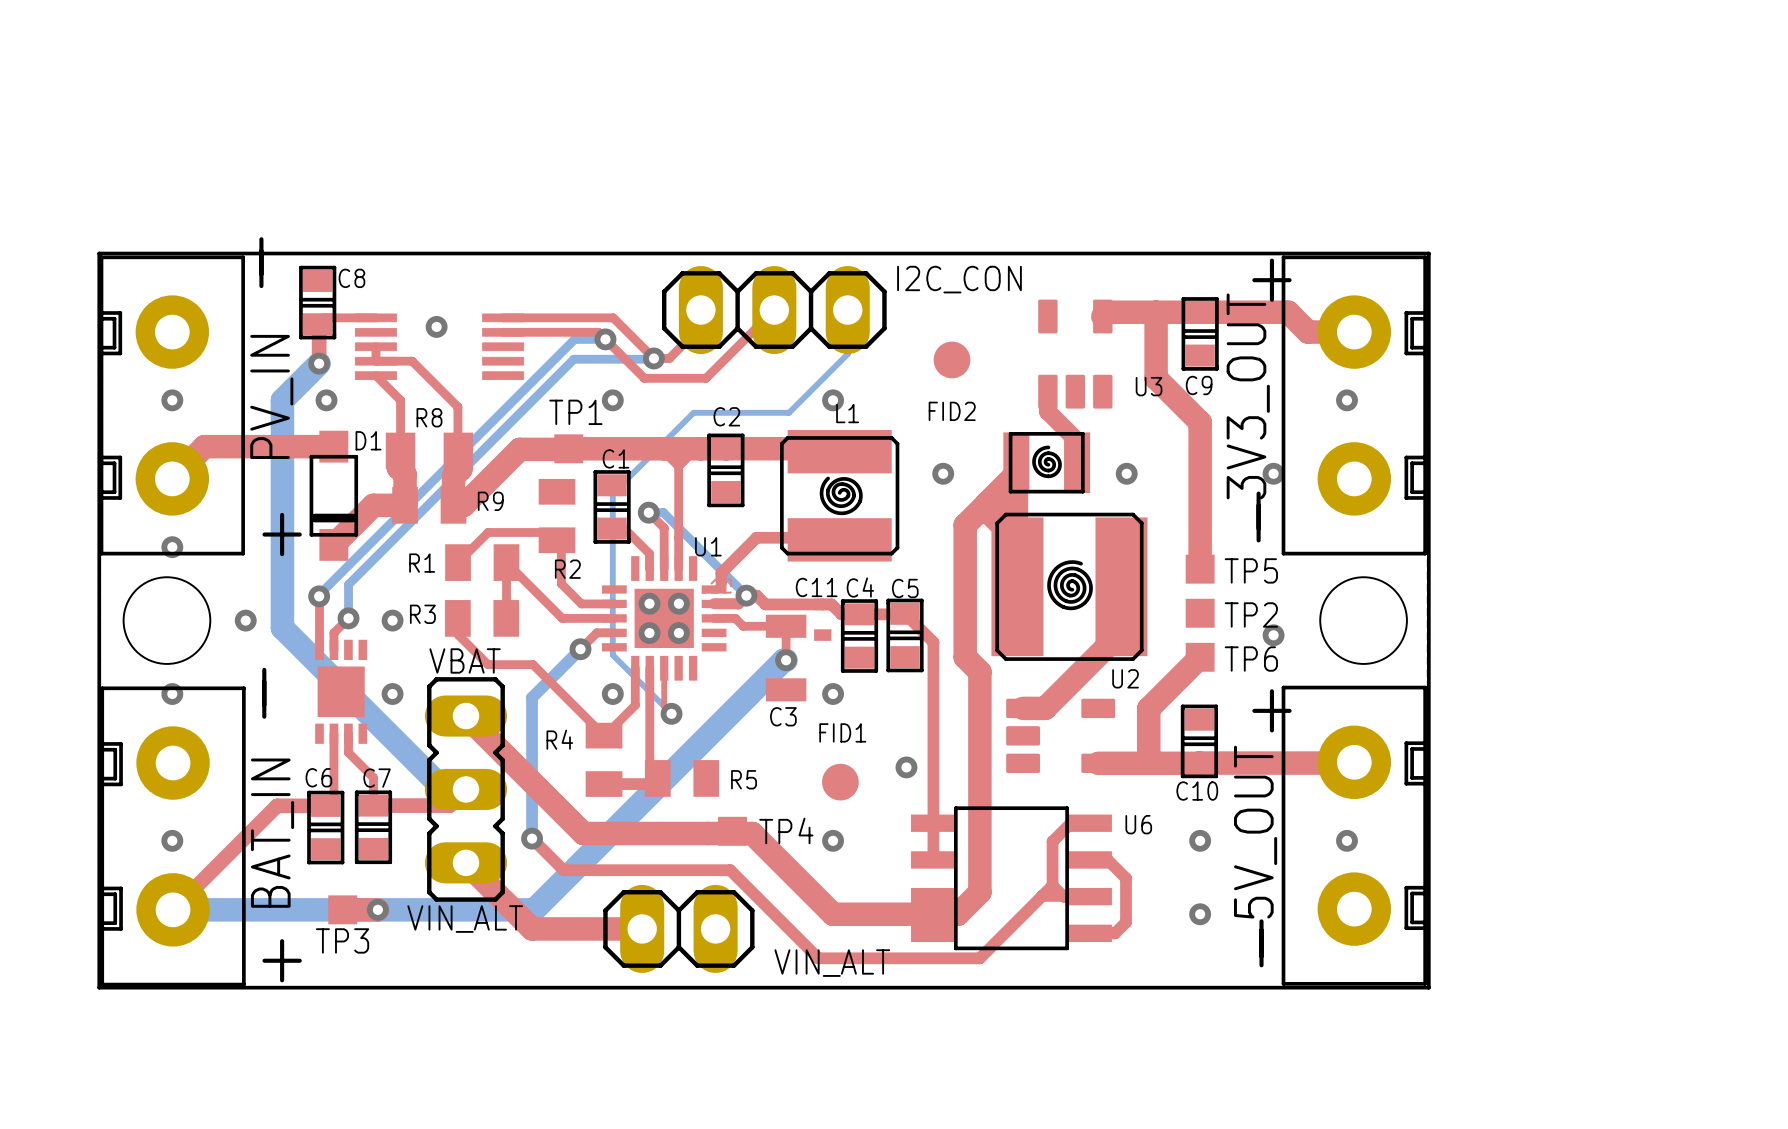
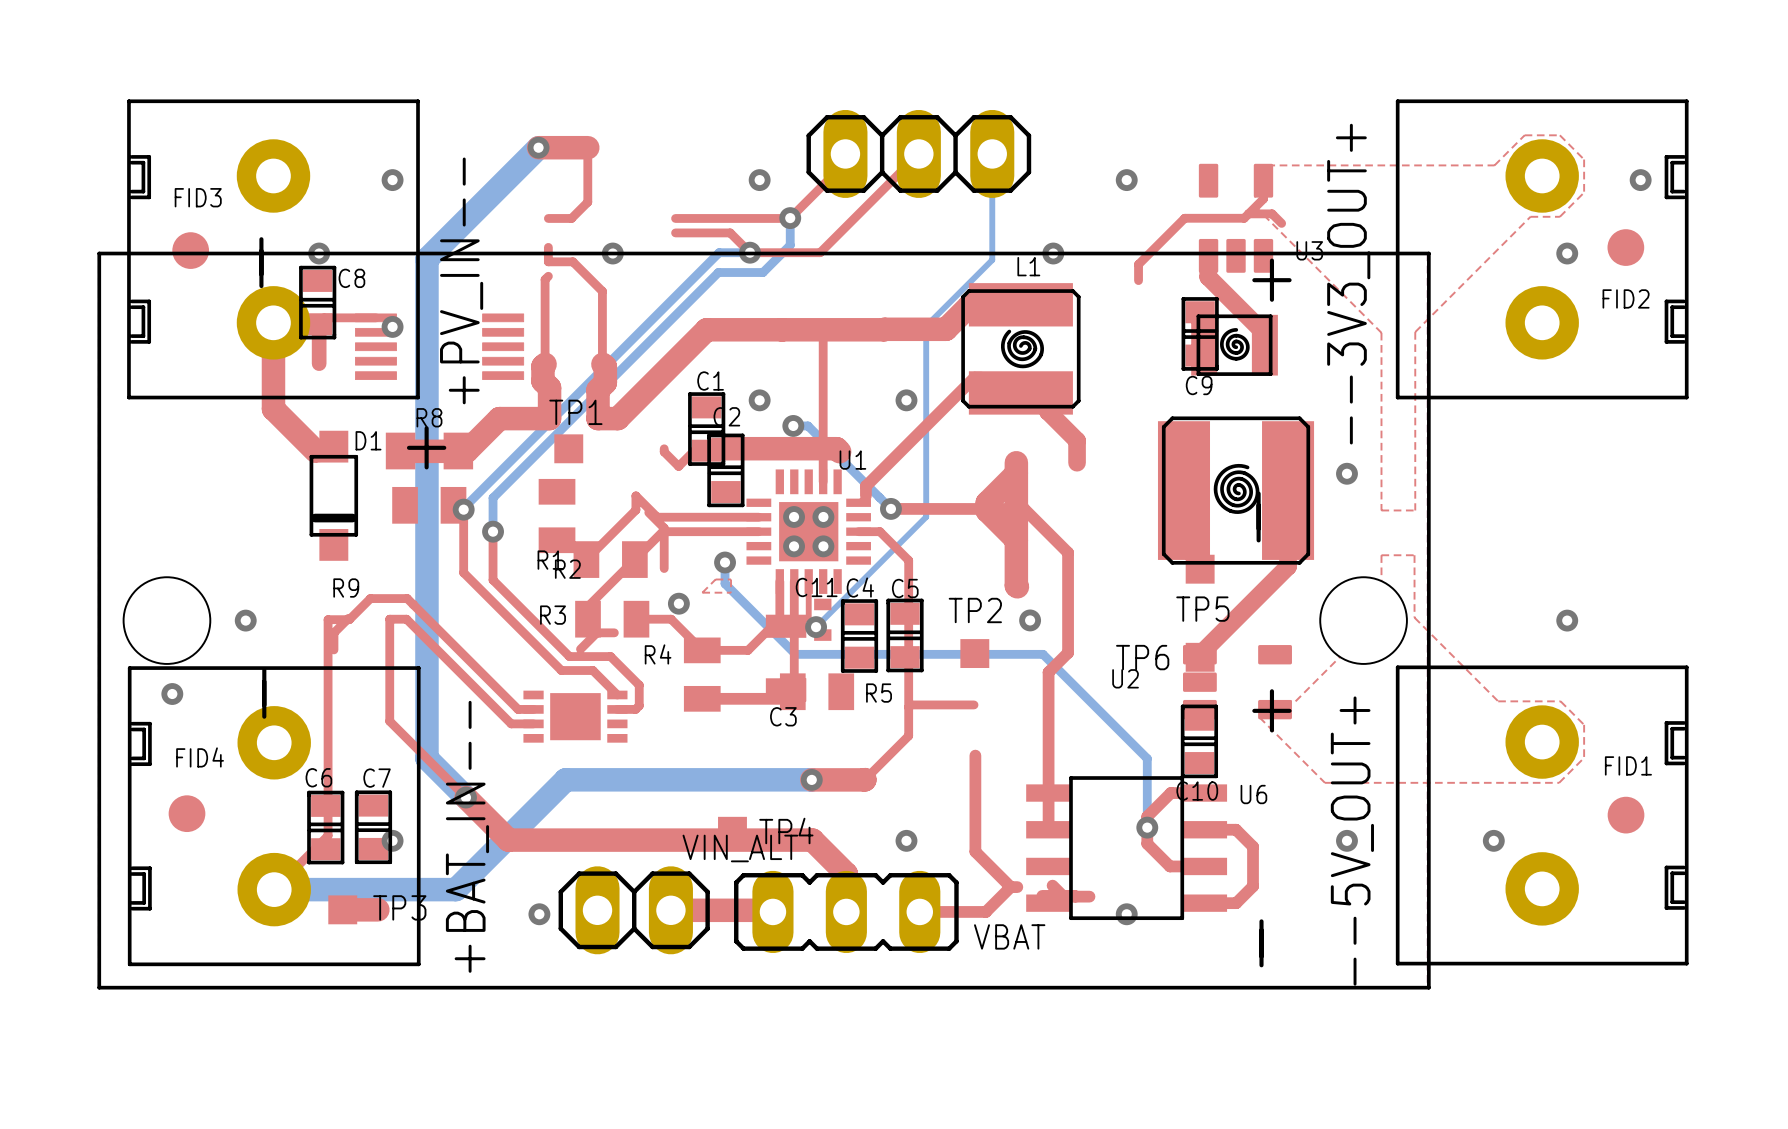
top zone outline: none -> (1524, 135) (1494, 165) (1255, 165) (1255, 206) (1381, 332) (1381, 510) (1415, 510) (1415, 332) (1530, 216) (1559, 216) (1584, 192) (1584, 159) (1559, 135) (1524, 135)
top track: none -> (538, 147) (587, 147) (587, 202) (571, 218) (548, 218)
bottom track: none -> (538, 147) (426, 259) (426, 758) (465, 797)
via: none -> (538, 147)
top track: none -> (845, 153) (845, 162) (789, 218) (675, 218)
top track: none -> (918, 153) (820, 252) (749, 252) (730, 232) (675, 232)
bottom track: none -> (992, 153) (992, 260) (926, 326) (926, 516) (816, 627)
via: none -> (392, 180)
via: none -> (759, 180)
via: none -> (1126, 180)
top track: none -> (1263, 180) (1263, 198) (1244, 218) (1184, 218) (1138, 264) (1138, 280)
via: none -> (1640, 180)
top track: none -> (1248, 213) (1272, 213) (1281, 223)
bottom track: none -> (790, 218) (790, 245) (762, 272) (718, 272) (493, 497) (493, 531)
via: none -> (790, 218)
top track: none -> (548, 247) (548, 261) (572, 261) (602, 291) (602, 364)
+PV_IN--: none -> (273, 249)
--3V3_OUT+: none -> (1542, 249)
FID3: none -> (190, 250)
via: none -> (749, 252)
via: none -> (319, 253)
via: none -> (612, 253)
via: none -> (1053, 253)
via: none -> (1567, 253)
top track: none -> (1208, 256) (1208, 277) (1264, 333) (1264, 345)
top track: none -> (548, 276) (545, 279) (545, 364) (542, 366) (542, 381) (549, 387) (549, 418) (499, 418) (466, 451) (414, 451)
text: I2C_CON (959, 279) -> none
top track: none -> (1020, 304) (969, 305) (945, 329) (706, 329) (617, 418) (598, 418) (598, 389) (605, 382) (605, 366) (602, 364)
top track: (700, 310) (700, 326) (669, 358) (653, 358) (613, 317) (503, 317) -> none
top track: (774, 310) (706, 378) (644, 378) (598, 332) (503, 332) -> none
part position: (774, 310) -> (918, 153)
bottom track: (847, 310) (847, 354) (789, 412) (693, 412) (612, 493) (612, 655) (671, 713) -> none
top track: (1156, 312) (1156, 378) (1200, 422) (1200, 569) -> none
top track: (1102, 316) (1107, 312) (1288, 312) (1308, 332) (1354, 332) -> none
top track: none -> (273, 322) (273, 409) (315, 451)
via: none -> (392, 326)
via: (436, 326) -> none
top track: none -> (823, 330) (823, 481)
bottom track: (605, 339) (574, 339) (319, 596) -> (749, 252) (719, 252) (463, 509)
via: (605, 339) -> none
top track: (375, 346) (375, 361) (412, 361) (457, 406) (457, 451) -> none
U3 position: (1075, 354) -> (1236, 218)
bottom track: (653, 358) (573, 359) (348, 584) (348, 618) -> none
via: (653, 358) -> none
FID2 position: (952, 359) -> (1625, 247)
bottom track: (319, 363) (282, 400) (282, 627) (443, 789) (465, 789) -> none
via: (319, 363) -> none
top track: (375, 375) (400, 400) (400, 451) (398, 453) (398, 467) (405, 474) (405, 505) (373, 505) (333, 544) -> none
top track: none -> (981, 377) (974, 377) (865, 486) (865, 495)
via: (172, 400) -> none
via: (326, 400) -> none
via: (612, 400) -> none
via: none -> (759, 400)
via: (833, 400) -> none
via: none -> (906, 400)
via: (1346, 400) -> none
PV_IN: (172, 405) -> none
3V3_OUT: (1354, 405) -> none
via: none -> (793, 425)
top track: (333, 446) (204, 446) (172, 478) -> none
top track: (725, 448) (519, 449) (463, 505) (453, 505) (453, 476) (460, 469) (460, 453) (458, 451) -> none
top track: (678, 449) (678, 568) -> none
part position: (1046, 462) -> (1234, 345)
via: (943, 473) -> none
via: (1126, 473) -> none
via: (1273, 473) -> none
via: none -> (1346, 473)
top track: none -> (1288, 490) (1288, 566) (1199, 654)
L1 position: (839, 495) -> (1020, 348)
R9 name position: R9 (490, 501) -> R9 (346, 588)
top track: (1016, 503) (987, 503) (965, 525) (965, 657) (979, 671) (979, 892) (957, 914) (833, 914) (752, 833) (583, 833) (465, 716) -> none
C1 position: (612, 506) -> (706, 429)
top track: none -> (890, 508) (1012, 508)
via: none -> (890, 508)
top track: none -> (1012, 508) (1024, 508) (1068, 552) (1068, 652) (1048, 672) (1048, 829)
top track: none -> (463, 509) (463, 572) (561, 670) (592, 670) (617, 694)
via: none -> (463, 509)
bottom track: (648, 512) (663, 512) (746, 595) -> (793, 425) (807, 425) (890, 508)
via: (648, 512) -> none
via: none -> (794, 516)
via: none -> (823, 516)
top track: none -> (758, 517) (657, 517) (635, 495) (635, 510) (586, 559)
top track: (612, 528) (624, 528) (649, 553) (649, 568) -> none
top track: none -> (493, 531) (493, 580) (569, 656) (610, 656) (639, 685) (639, 705) (635, 709) (617, 709)
via: none -> (493, 531)
top track: none -> (758, 531) (662, 531) (588, 606) (588, 619)
top track: none -> (858, 531) (879, 531) (908, 560) (908, 735) (865, 779)
top track: (549, 532) (488, 532) (458, 562) -> none
text position: + (282, 534) -> + (426, 447)
top track: (839, 539) (837, 537) (756, 537) (721, 572) (721, 582) -> none
top track: (557, 540) (561, 544) (561, 583) (581, 603) (614, 603) -> none
via: none -> (794, 546)
via: none -> (823, 546)
via: (172, 547) -> none
top zone outline: none -> (1381, 555) (1381, 615) (1295, 701) (1259, 701) (1259, 717) (1324, 782) (1559, 782) (1584, 757) (1584, 724) (1560, 701) (1498, 701) (1414, 617) (1414, 555) (1381, 555)
R1 position: (482, 562) -> (610, 559)
bottom track: none -> (725, 562) (725, 583) (795, 654) (1043, 654) (1147, 758) (1147, 827)
via: none -> (725, 562)
TP5 name position: TP5 (1251, 570) -> TP5 (1202, 609)
top track: none -> (779, 581) (779, 618) (748, 650) (702, 650) (671, 619) (636, 619)
top track: none -> (794, 581) (792, 691) (785, 698) (702, 698)
part position: (1069, 586) -> (1236, 490)
top track: (1121, 586) (1121, 632) (1045, 708) (1023, 708) -> none
via: (746, 595) -> none
top track: (319, 596) (319, 649) -> none
via: (319, 596) -> none
via: (649, 603) -> none
top track: (714, 603) (738, 603) (746, 595) (756, 595) (765, 604) (831, 604) (841, 614) (905, 613) (933, 642) (933, 859) -> none
TP2 position: (1200, 613) -> (974, 653)
TP2 name position: TP2 (1251, 614) -> TP2 (975, 610)
via: (348, 618) -> none
top track: (457, 618) (458, 635) (488, 664) (533, 664) (604, 735) (635, 705) (635, 668) -> none
R3 position: (482, 618) -> (612, 619)
top track: (506, 618) (506, 562) (562, 618) (614, 618) -> none
U1 position: (664, 618) -> (808, 531)
top track: (714, 618) (735, 618) (743, 626) (786, 626) (786, 660) -> none
via: (392, 620) -> none
via: none -> (1030, 620)
via: none -> (1567, 620)
via: none -> (816, 627)
via: (649, 633) -> none
via: (678, 633) -> none
via: (1273, 635) -> none
bottom track: (580, 649) (532, 697) (532, 838) -> none
via: (580, 649) -> none
top track: (1200, 657) (1148, 708) (1148, 763) -> none
TP6 name position: TP6 (1251, 659) -> TP6 (1142, 657)
text position: VBAT (465, 660) -> VBAT (1009, 936)
bottom track: (786, 660) (783, 660) (534, 909) (173, 909) -> none
via: (786, 660) -> none
top track: (649, 668) (649, 766) (657, 778) (652, 784) (604, 784) -> none
top track: (664, 668) (664, 706) (671, 713) -> (808, 581) (808, 619) (816, 627)
part rotation: 0° (341, 691) -> 90° clockwise (575, 716)
part position: (341, 691) -> (575, 716)
via: (392, 694) -> none
via: (612, 694) -> none
via: (833, 694) -> none
top track: none -> (974, 704) (910, 704) (908, 707)
top track: none -> (533, 709) (518, 709) (407, 598) (370, 598) (349, 619) (328, 619) (328, 835) (274, 889)
via: (671, 713) -> none
top track: none -> (533, 723) (511, 723) (406, 619) (389, 619) (389, 721) (508, 840) (812, 840) (846, 873) (846, 911)
top track: (333, 733) (333, 797) (325, 805) (277, 805) (173, 909) -> none
top track: (348, 733) (348, 752) (373, 777) (373, 805) (449, 805) (465, 789) -> none
U2 position: (1060, 735) -> (1237, 682)
top track: none -> (975, 755) (975, 851) (1010, 887)
R4 position: (604, 759) -> (702, 674)
top track: (1354, 762) (1199, 763) -> none
top track: (1098, 763) (1199, 763) -> none
via: (906, 767) -> none
R5 position: (682, 778) -> (817, 691)
top track: none -> (811, 779) (864, 779)
bottom track: none -> (811, 779) (565, 779) (455, 889) (274, 889)
via: none -> (811, 779)
FID1 position: (840, 782) -> (1626, 815)
part rotation: 0° (465, 789) -> 90° clockwise (846, 911)
part position: (465, 789) -> (846, 911)
top track: none -> (1204, 793) (1170, 793) (1147, 816) (1147, 843) (1169, 866) (1204, 866)
via: none -> (465, 797)
FID4: none -> (187, 813)
--5V_OUT+: none -> (1542, 815)
+BAT_IN--: none -> (274, 816)
top track: (1089, 823) (1070, 823) (1052, 841) (1052, 885) (979, 958) (818, 958) (730, 870) (563, 870) (532, 838) -> none
via: none -> (1147, 827)
top track: none -> (1204, 829) (1236, 829) (1253, 846) (1253, 886) (1236, 903) (1204, 903)
5V_OUT: (1354, 835) -> none
BAT_IN: (173, 836) -> none
via: (532, 838) -> none
via: (172, 840) -> none
via: none -> (392, 840)
via: (833, 840) -> none
via: none -> (906, 840)
via: (1200, 840) -> none
via: none -> (1493, 840)
text: none -> VIN_ALT (740, 848)
top track: (1089, 859) (1107, 859) (1126, 878) (1126, 922) (1114, 933) (1089, 933) -> none
top track: (465, 862) (532, 928) (642, 928) -> none
U6 position: (1011, 878) -> (1126, 848)
top track: none -> (1010, 887) (1017, 887)
top track: none -> (1010, 887) (985, 911) (919, 911)
via: (377, 909) -> none
top track: none -> (670, 910) (771, 910) (772, 911)
via: none -> (539, 914)
via: none -> (1126, 914)
via: (1200, 914) -> none
text: VIN_ALT (465, 919) -> none
part position: (678, 928) -> (634, 910)
TP3 name position: TP3 (342, 940) -> TP3 (399, 907)
text: + (282, 960) -> none
text: VIN_ALT (832, 963) -> none

